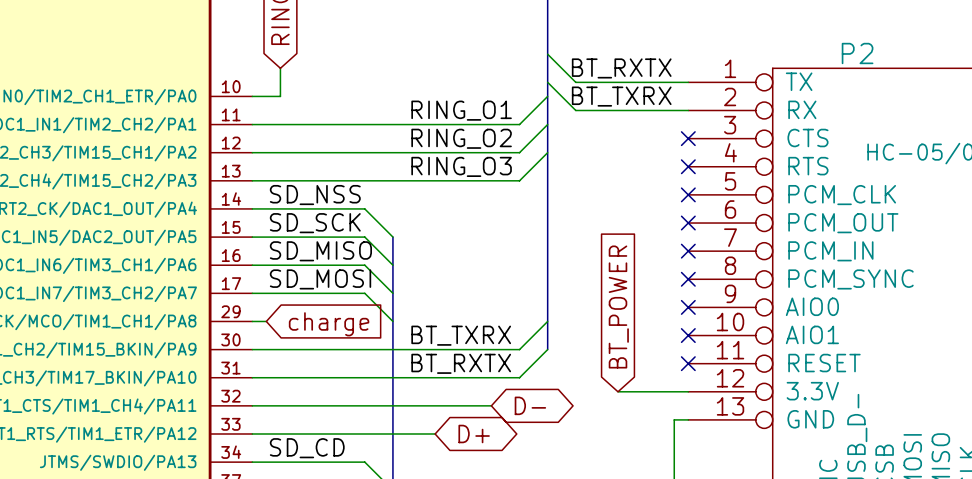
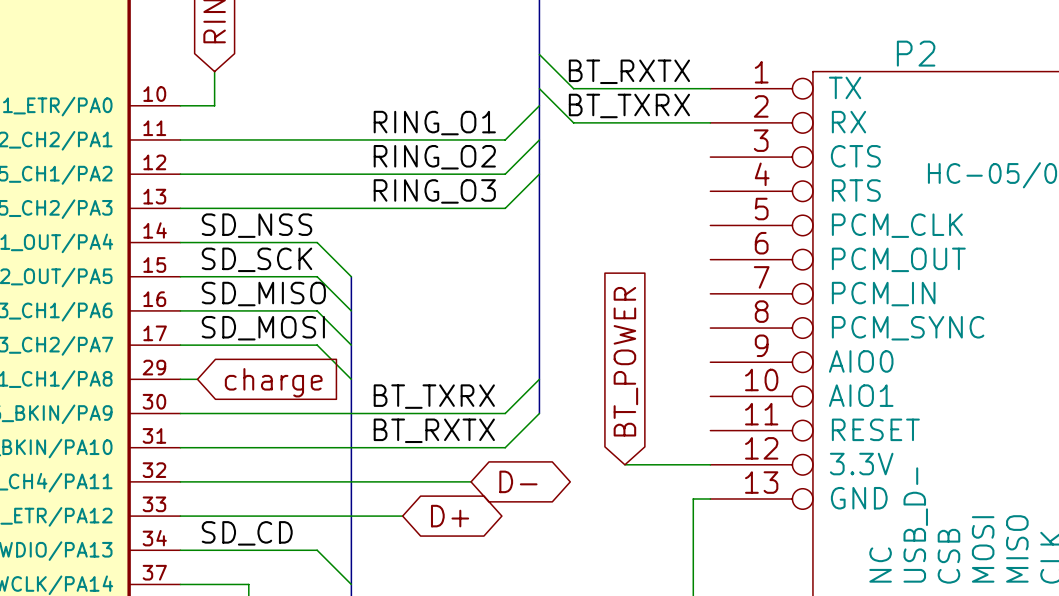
no-connect mark: (688, 138) -> none
no-connect mark: (688, 166) -> none
no-connect mark: (688, 194) -> none
no-connect mark: (688, 223) -> none
no-connect mark: (688, 251) -> none
no-connect mark: (688, 279) -> none
no-connect mark: (688, 307) -> none
no-connect mark: (688, 335) -> none
no-connect mark: (688, 363) -> none

